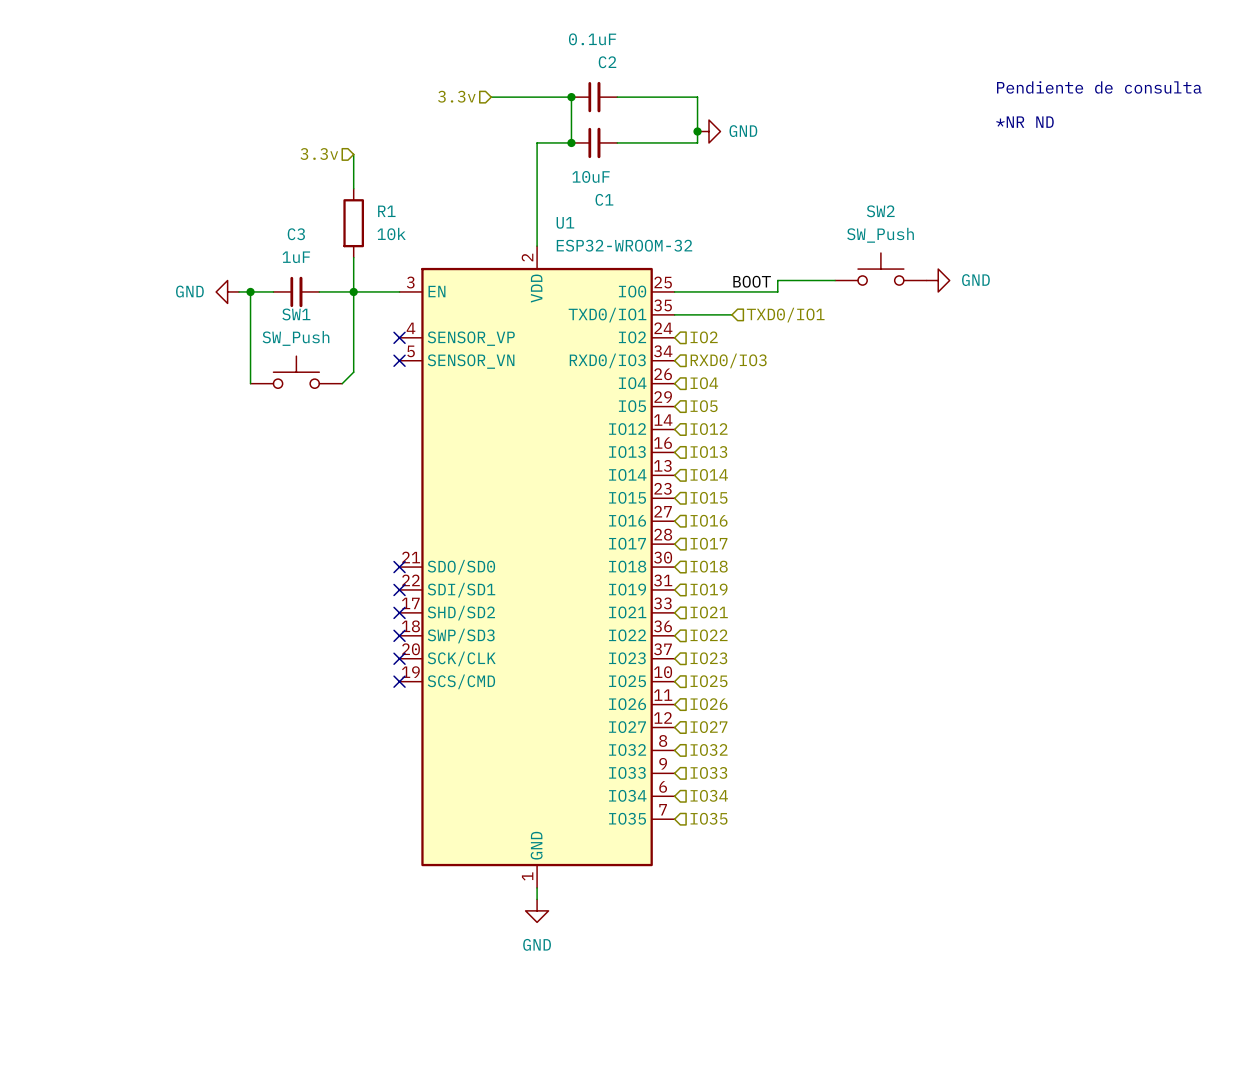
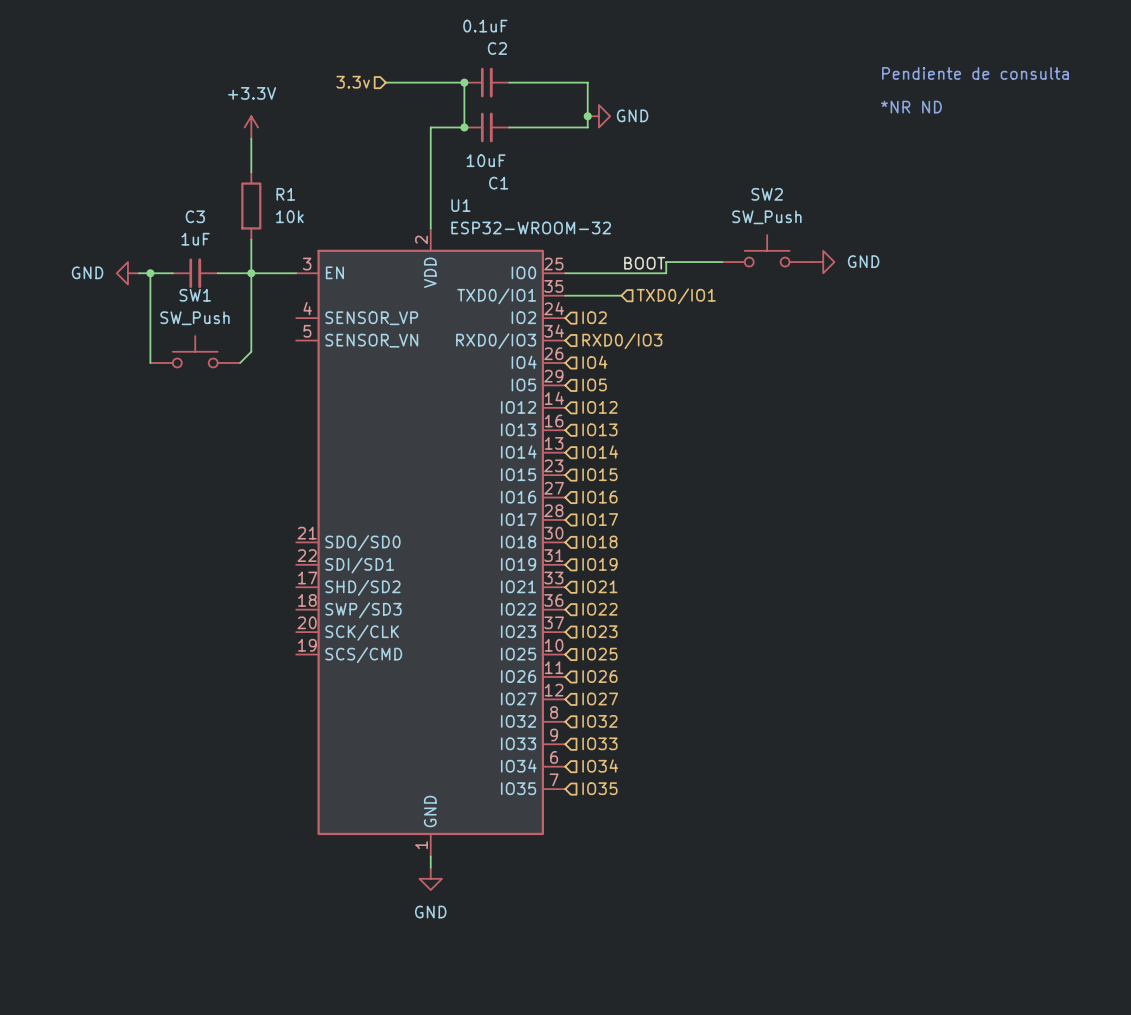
power symbol: none -> +3.3V (251, 127)
hierarchical label: 3.3v (319, 154) -> none
no-connect mark: (399, 337) -> none
no-connect mark: (399, 360) -> none
no-connect mark: (399, 567) -> none
no-connect mark: (399, 589) -> none
no-connect mark: (399, 612) -> none
no-connect mark: (399, 635) -> none
no-connect mark: (399, 658) -> none
no-connect mark: (399, 681) -> none

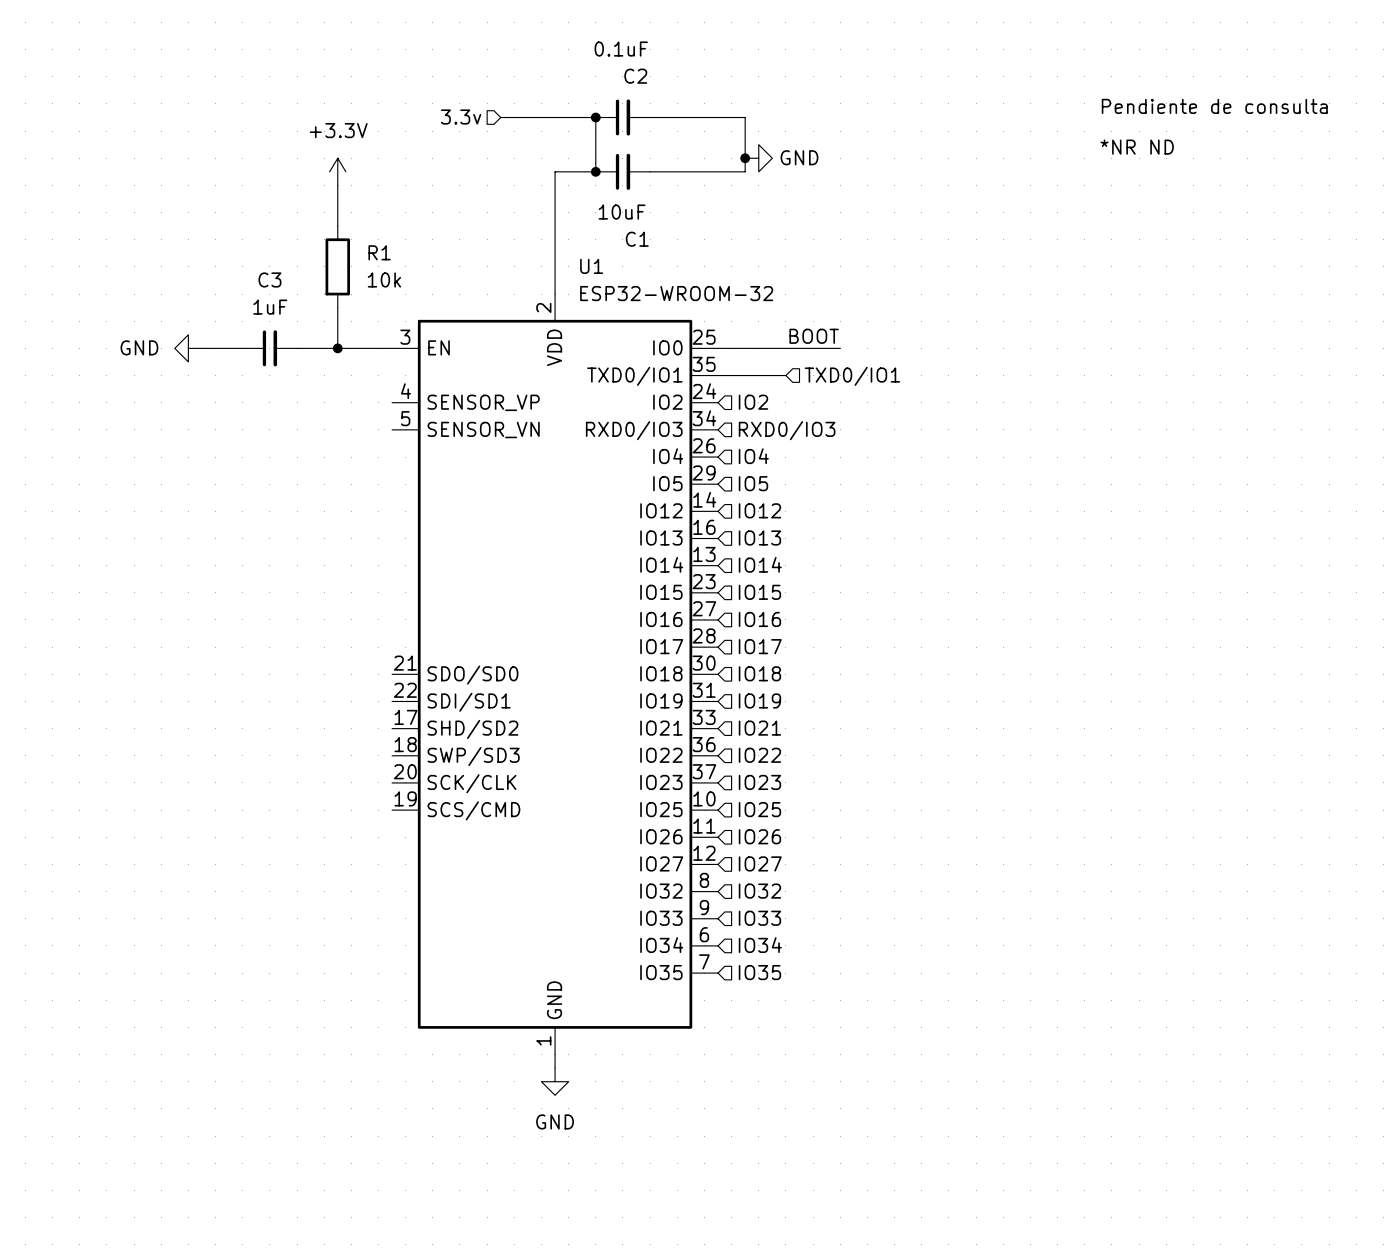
SW2: SW_Push (767, 250) -> none
wire: (722, 262) (666, 262) (666, 273) -> none
power symbol: GND (823, 262) -> none
wire: (150, 273) (150, 362) -> none
junction: (150, 273) -> none
wire: (251, 273) (251, 351) (240, 362) -> none
SW1: SW_Push (195, 351) -> none

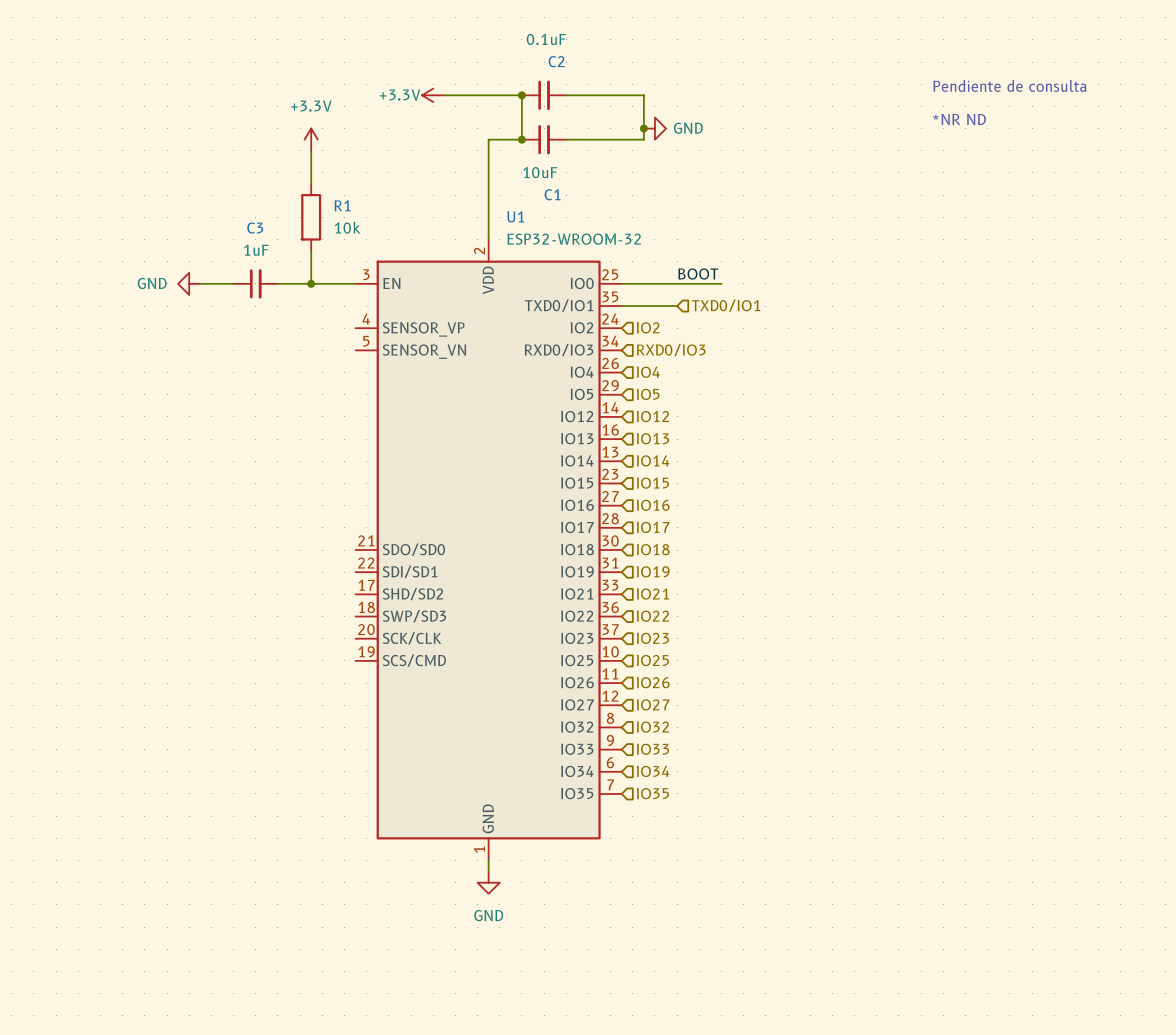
hierarchical label: 3.3v (461, 117) -> none
power symbol: none -> +3.3V (433, 95)

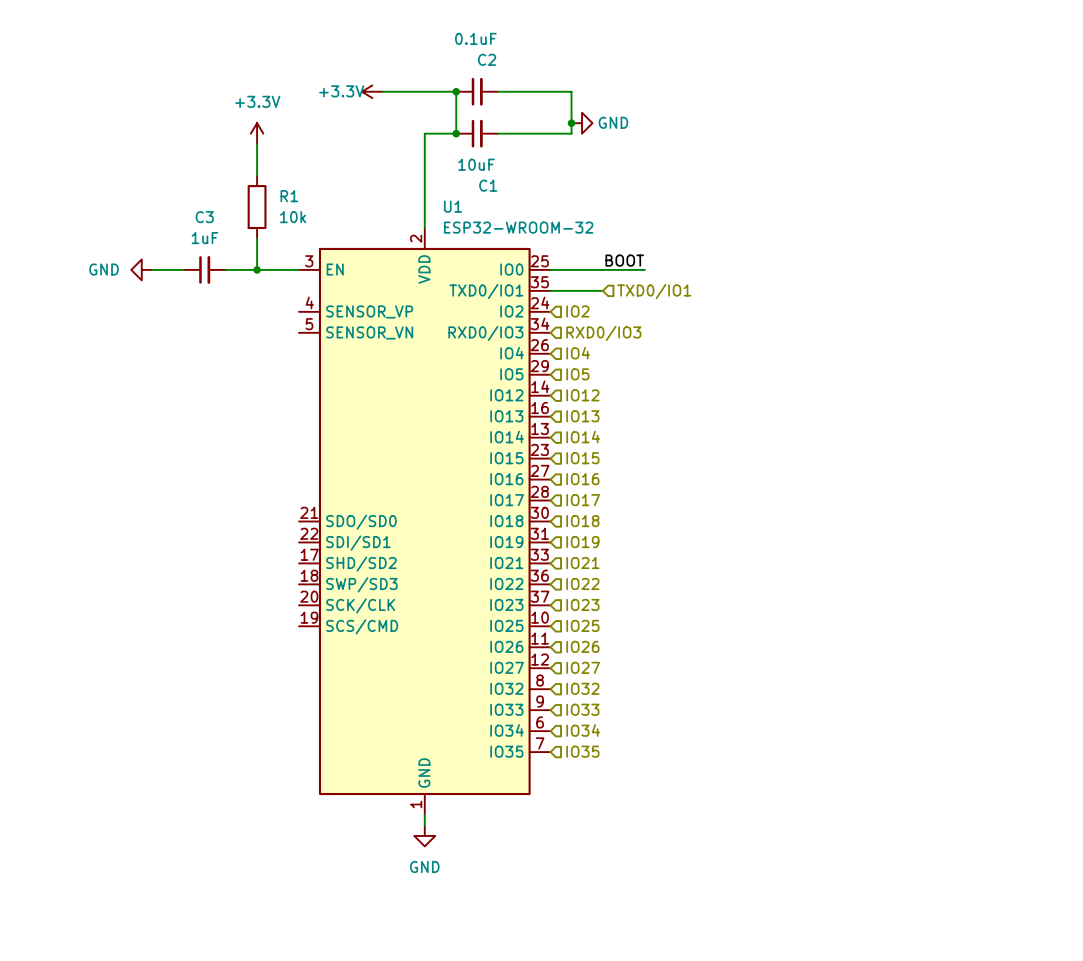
text: Pendiente de consulta (1009, 85) -> none
text: *NR ND (959, 119) -> none

